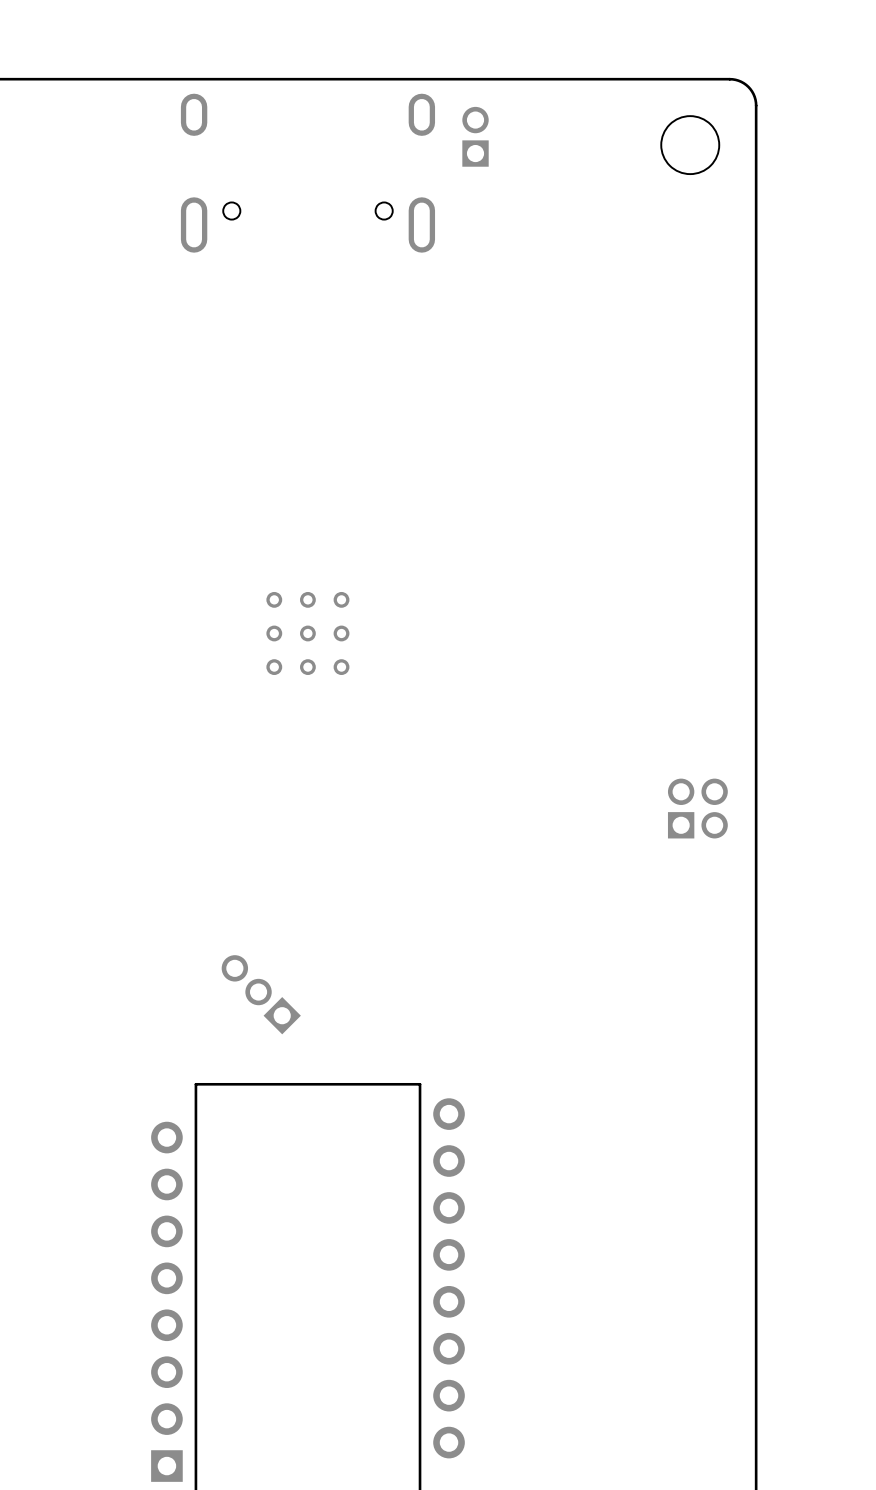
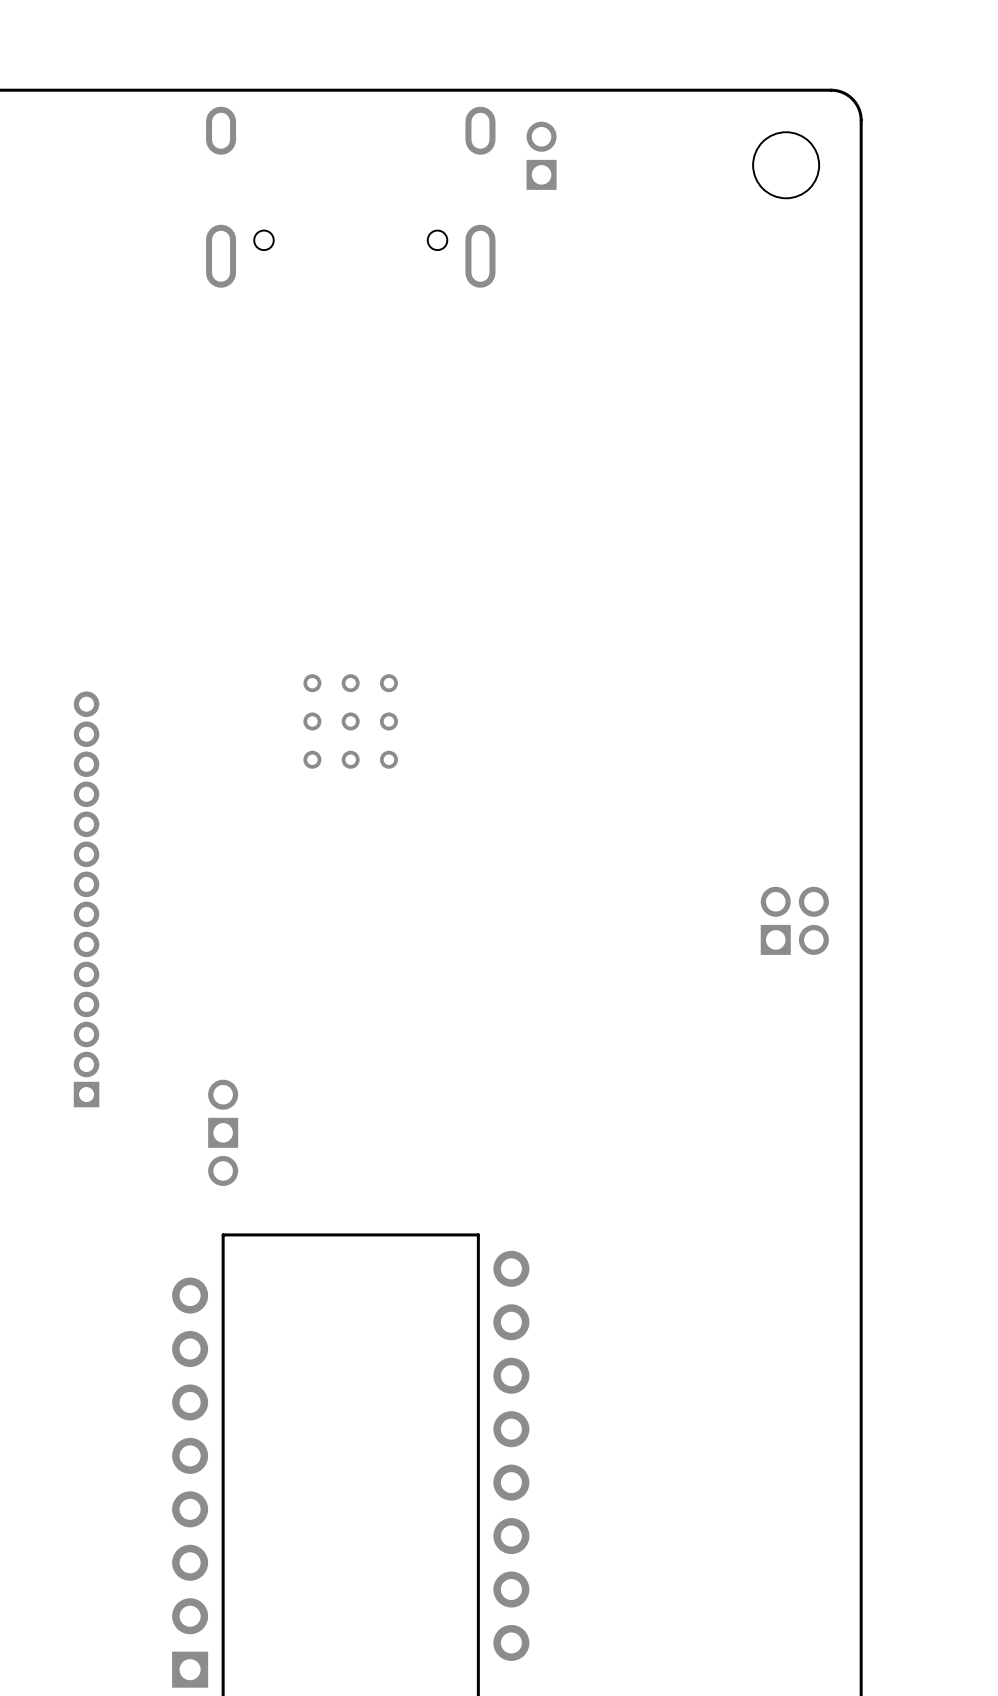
part: none -> (86, 899)
part: none -> (223, 1132)
part: (261, 994) -> none

